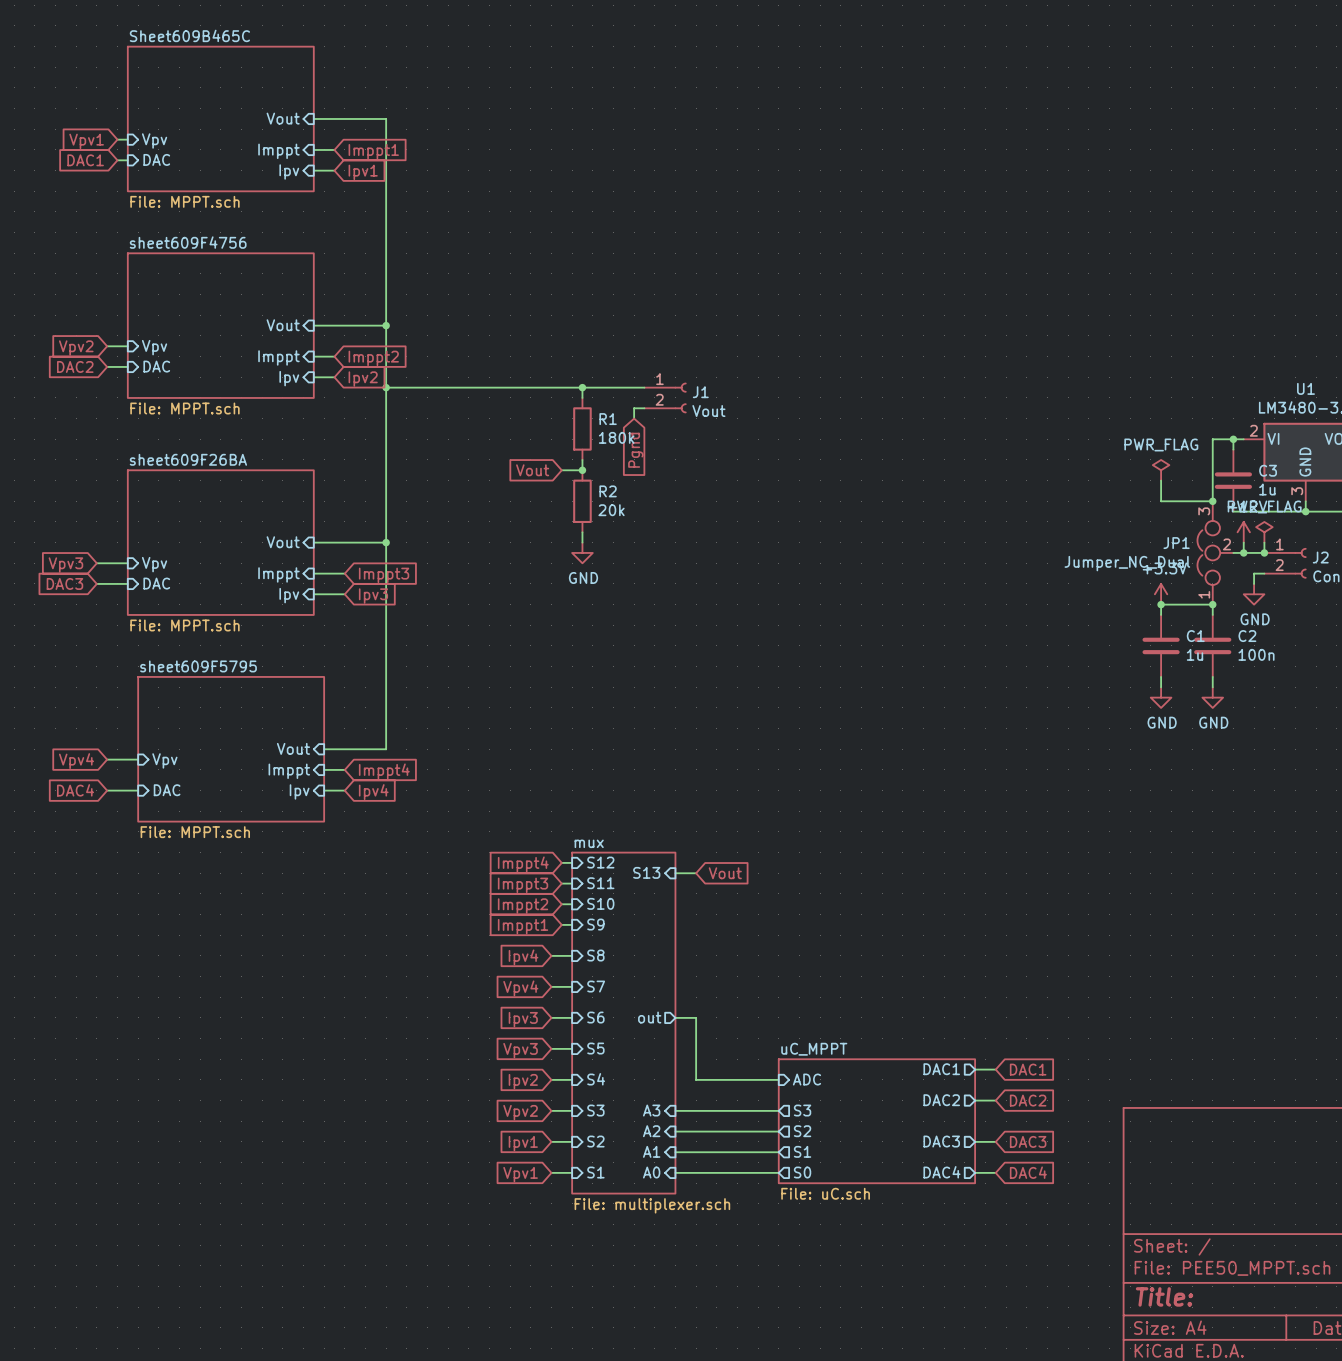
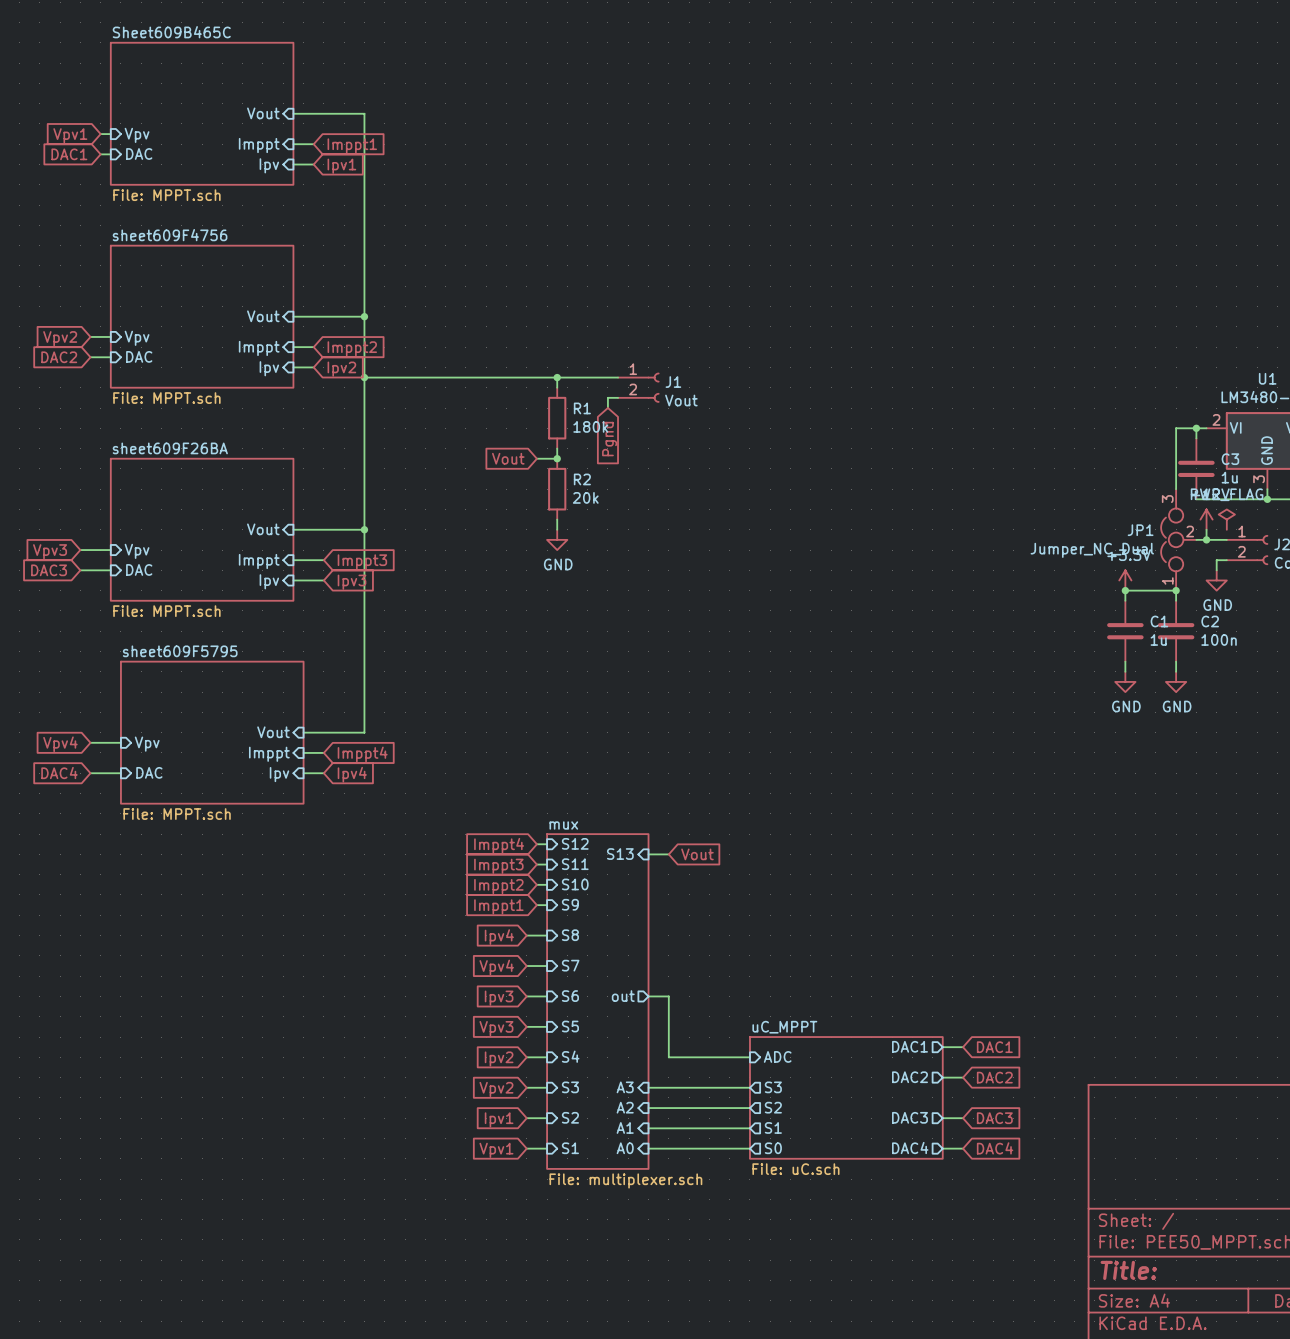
power symbol: PWR_FLAG (1161, 470) -> none
wire: (1161, 480) (1161, 501) (1212, 501) -> none
junction: (1212, 501) -> none
wire: (1264, 542) (1264, 552) -> none
junction: (1264, 552) -> none

